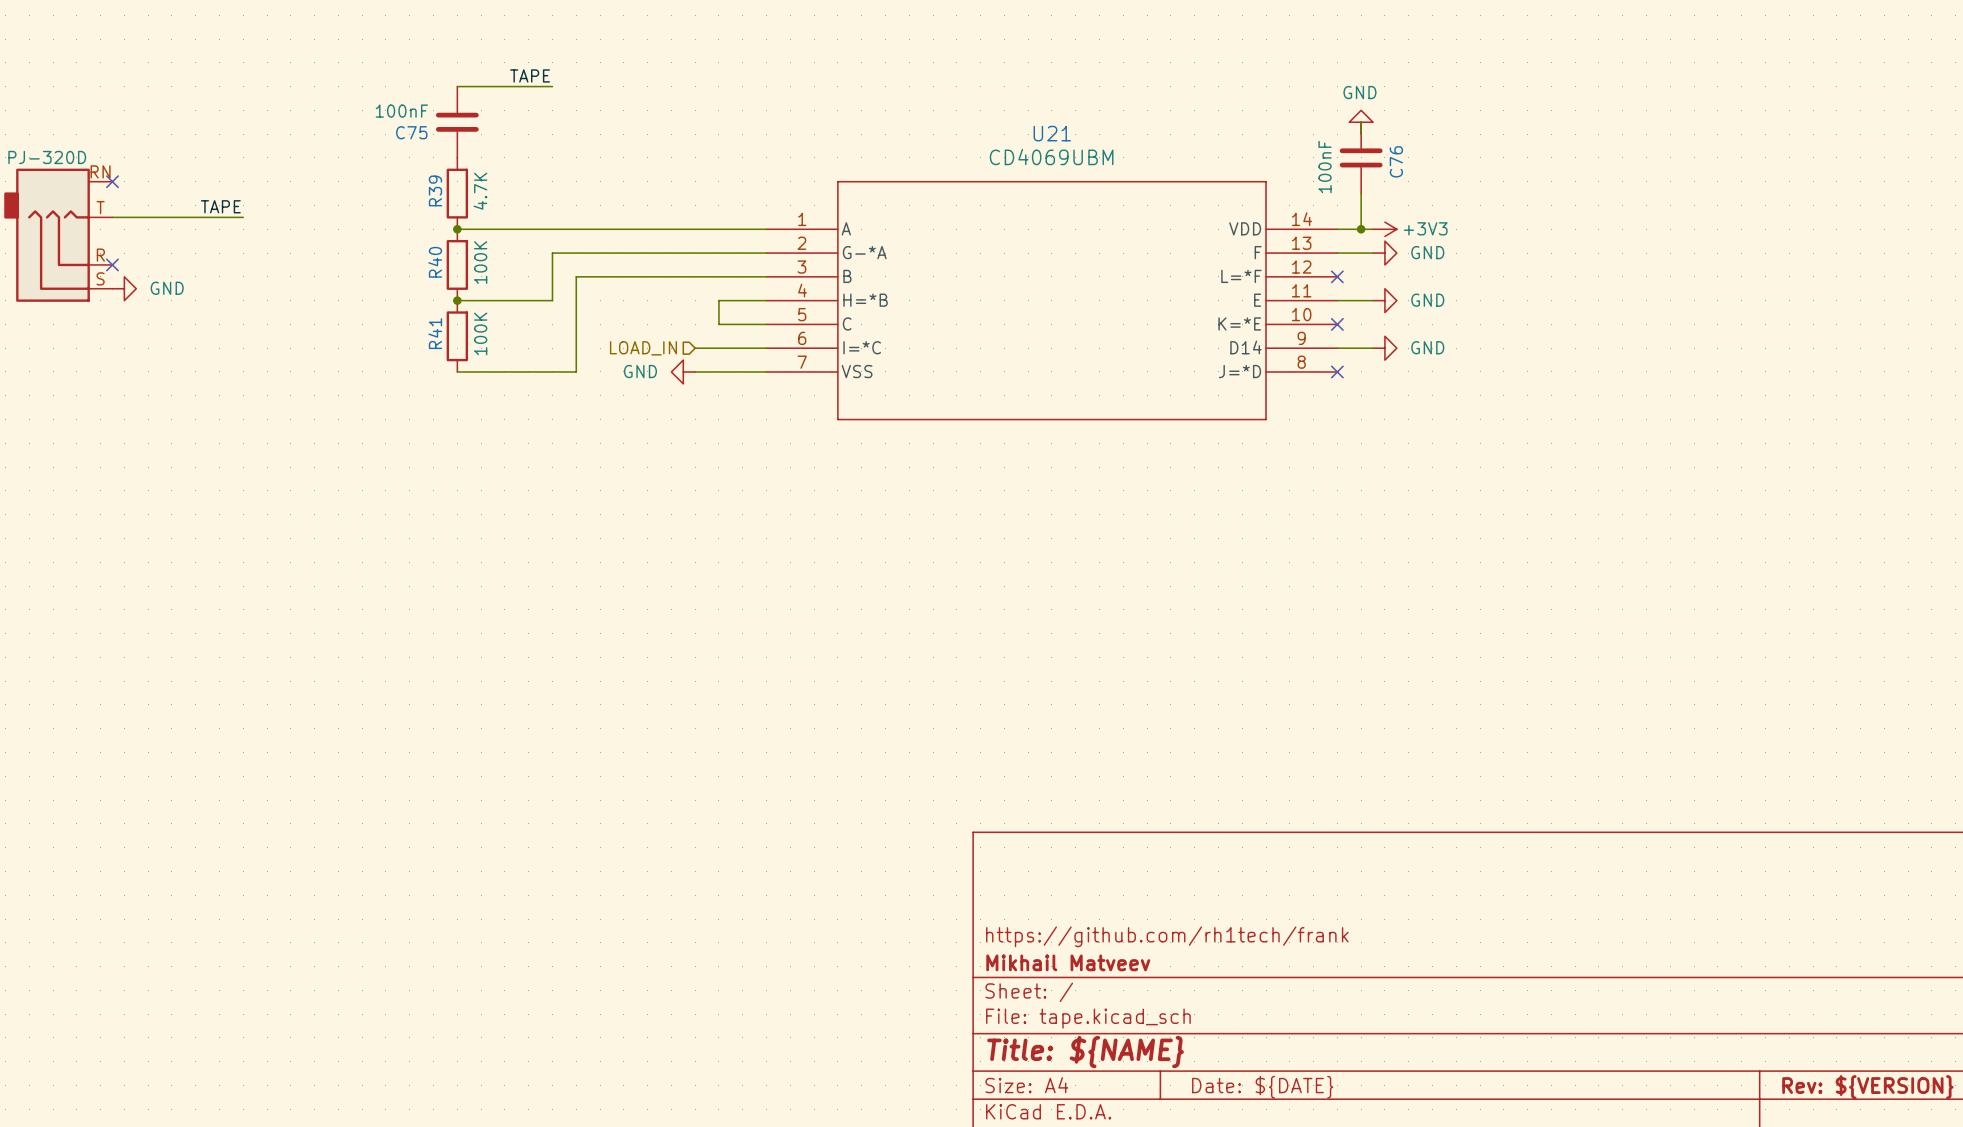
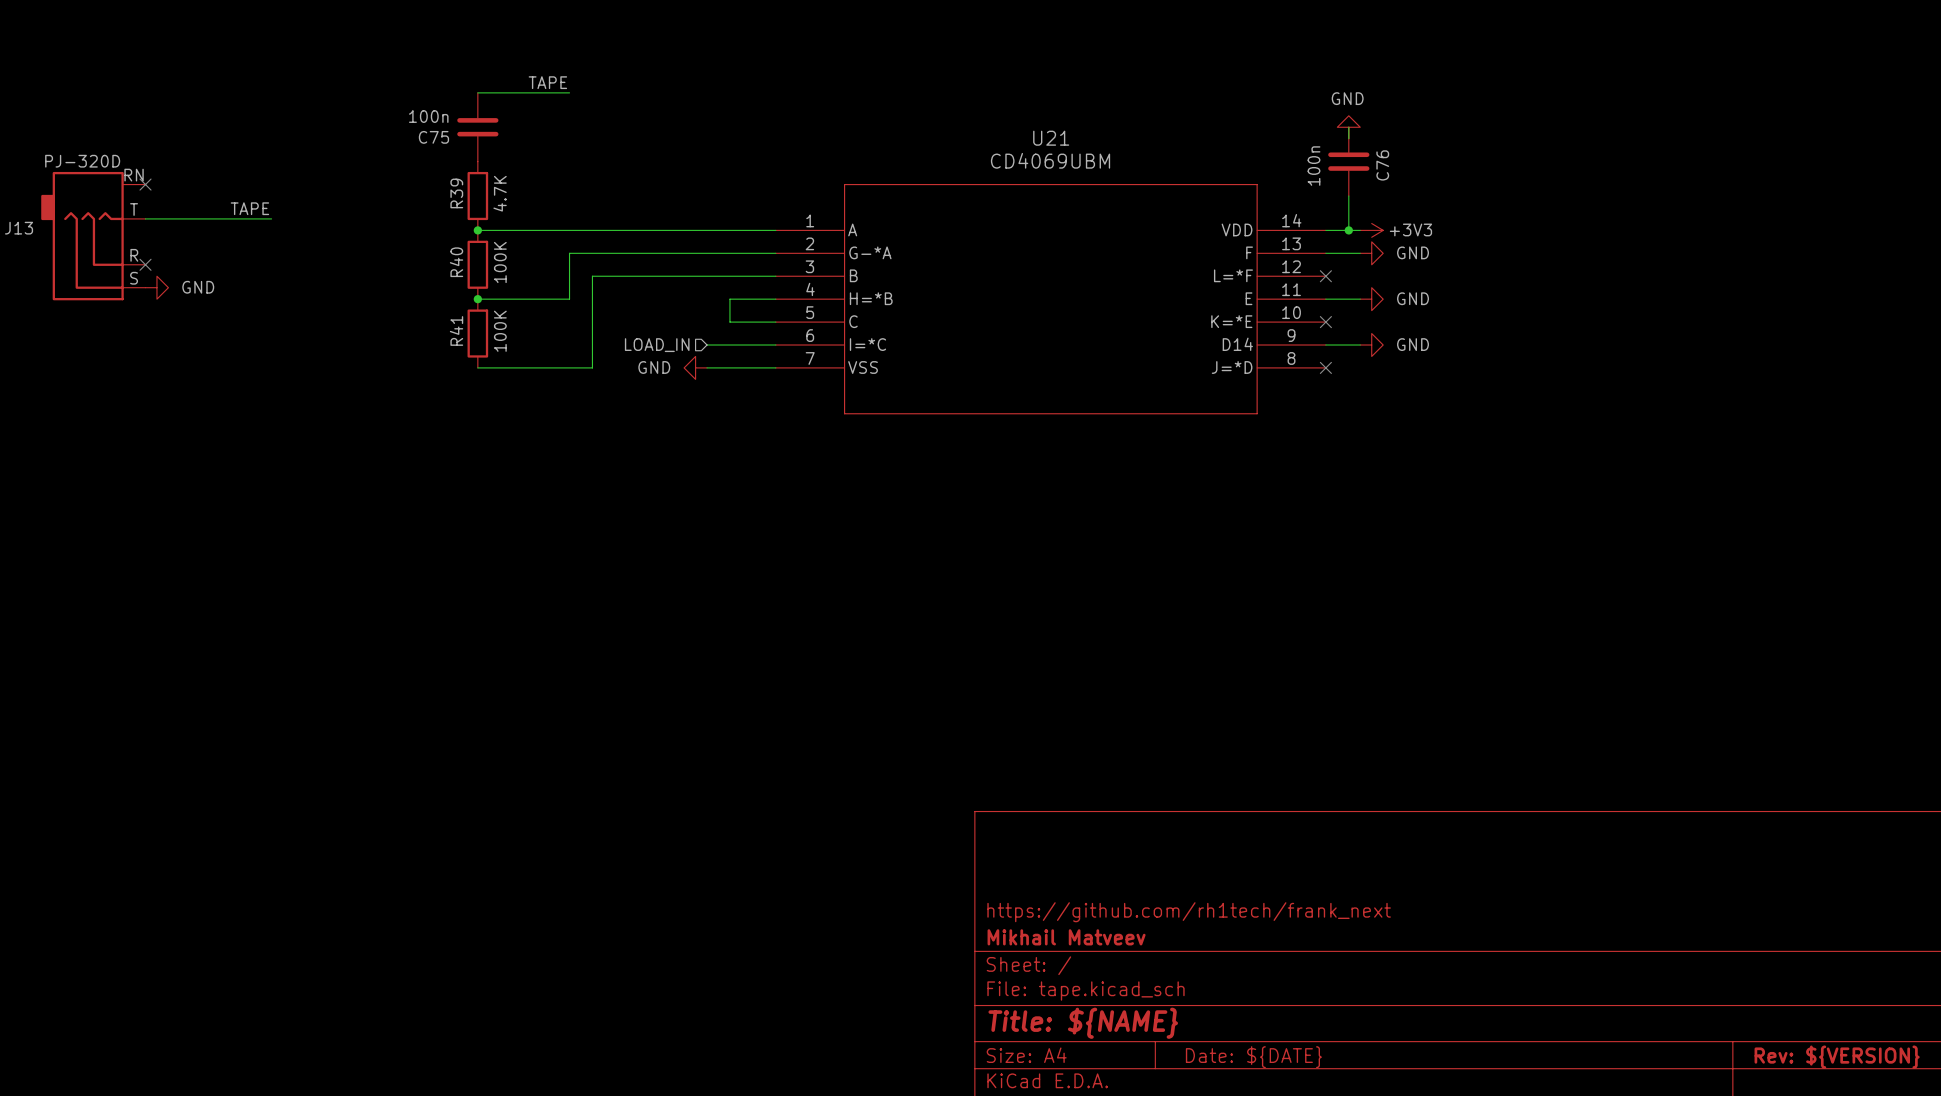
C75 value: 100nF (401, 111) -> 100n (428, 116)
C76 value: 100nF (1325, 167) -> 100n (1314, 166)
title block: https://github.com/rh1tech/frank (1167, 936) -> https://github.com/rh1tech/frank_next (1189, 912)

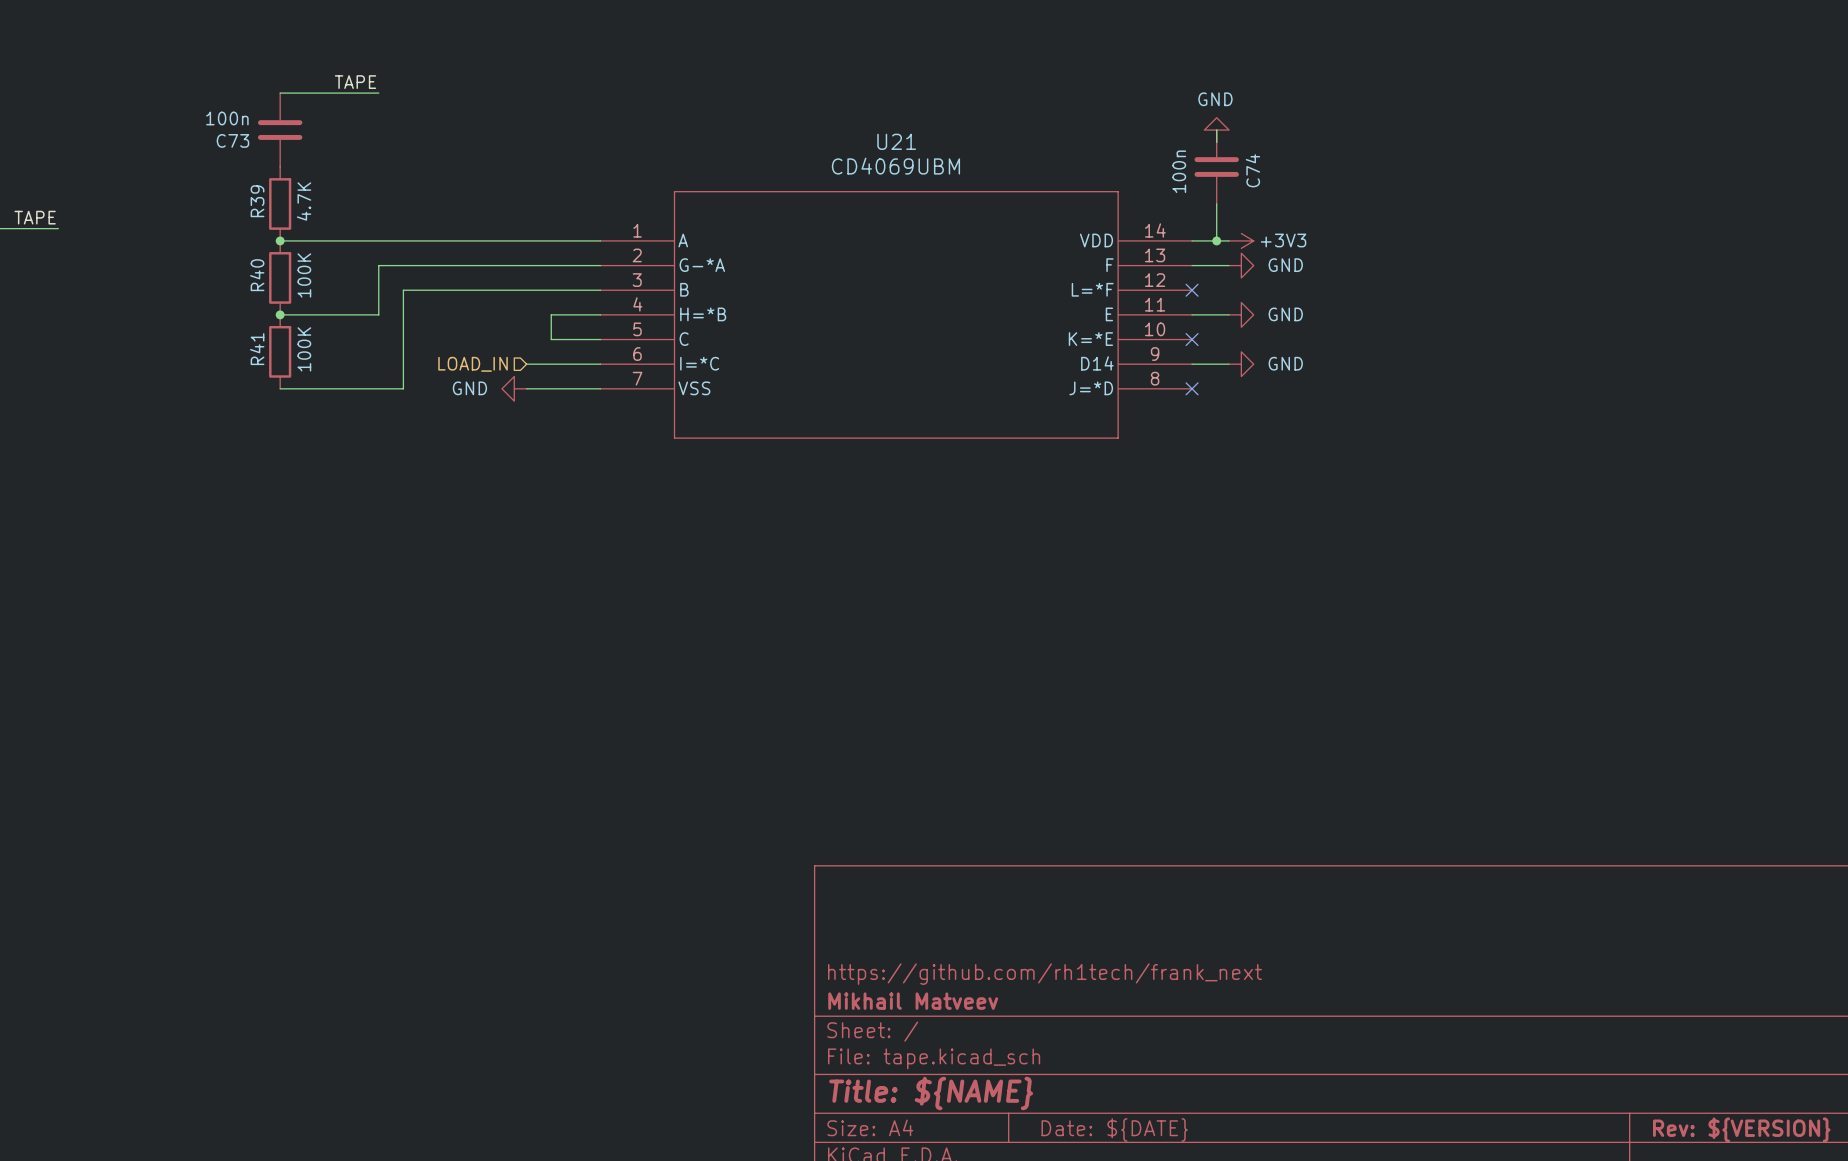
C75 name: C75 (433, 137) -> C73 (232, 140)
C76 name: C76 (1382, 165) -> C74 (1252, 170)

